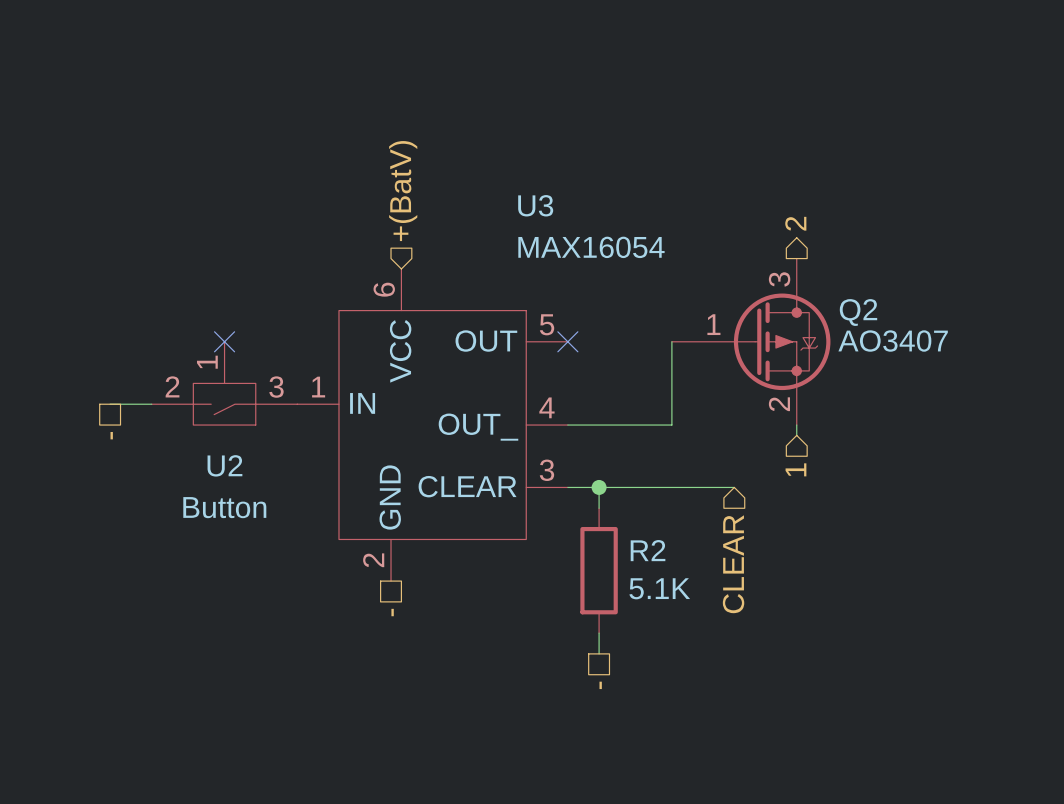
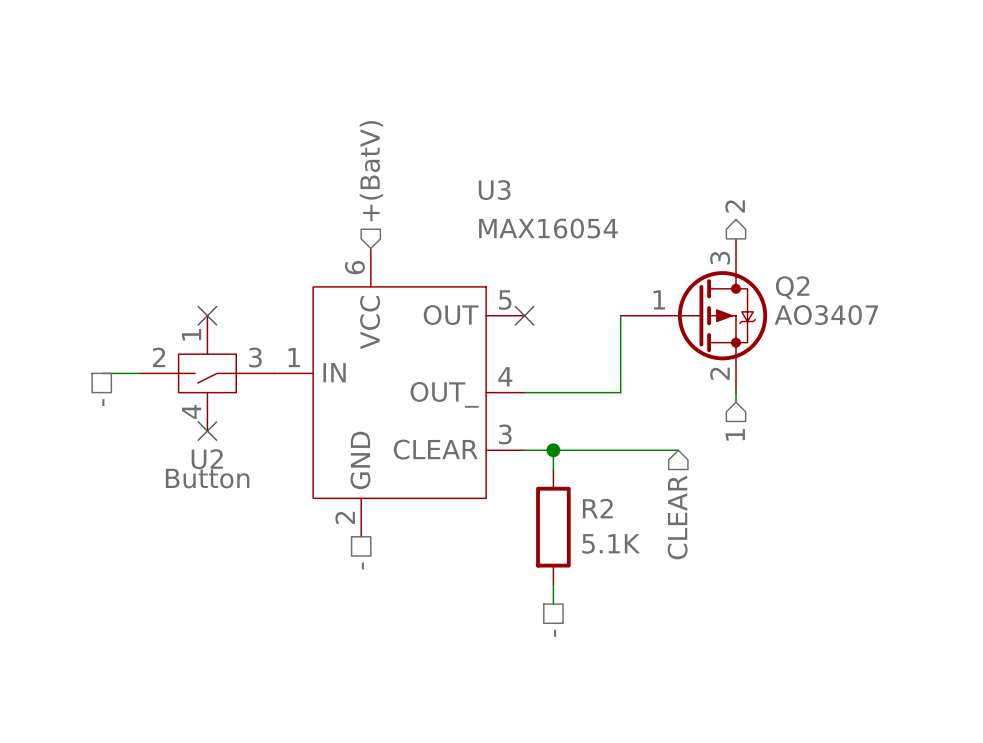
U2 symbol: [151, 341, 298, 426] -> [140, 315, 275, 432]
no-connect mark: none -> (207, 431)

